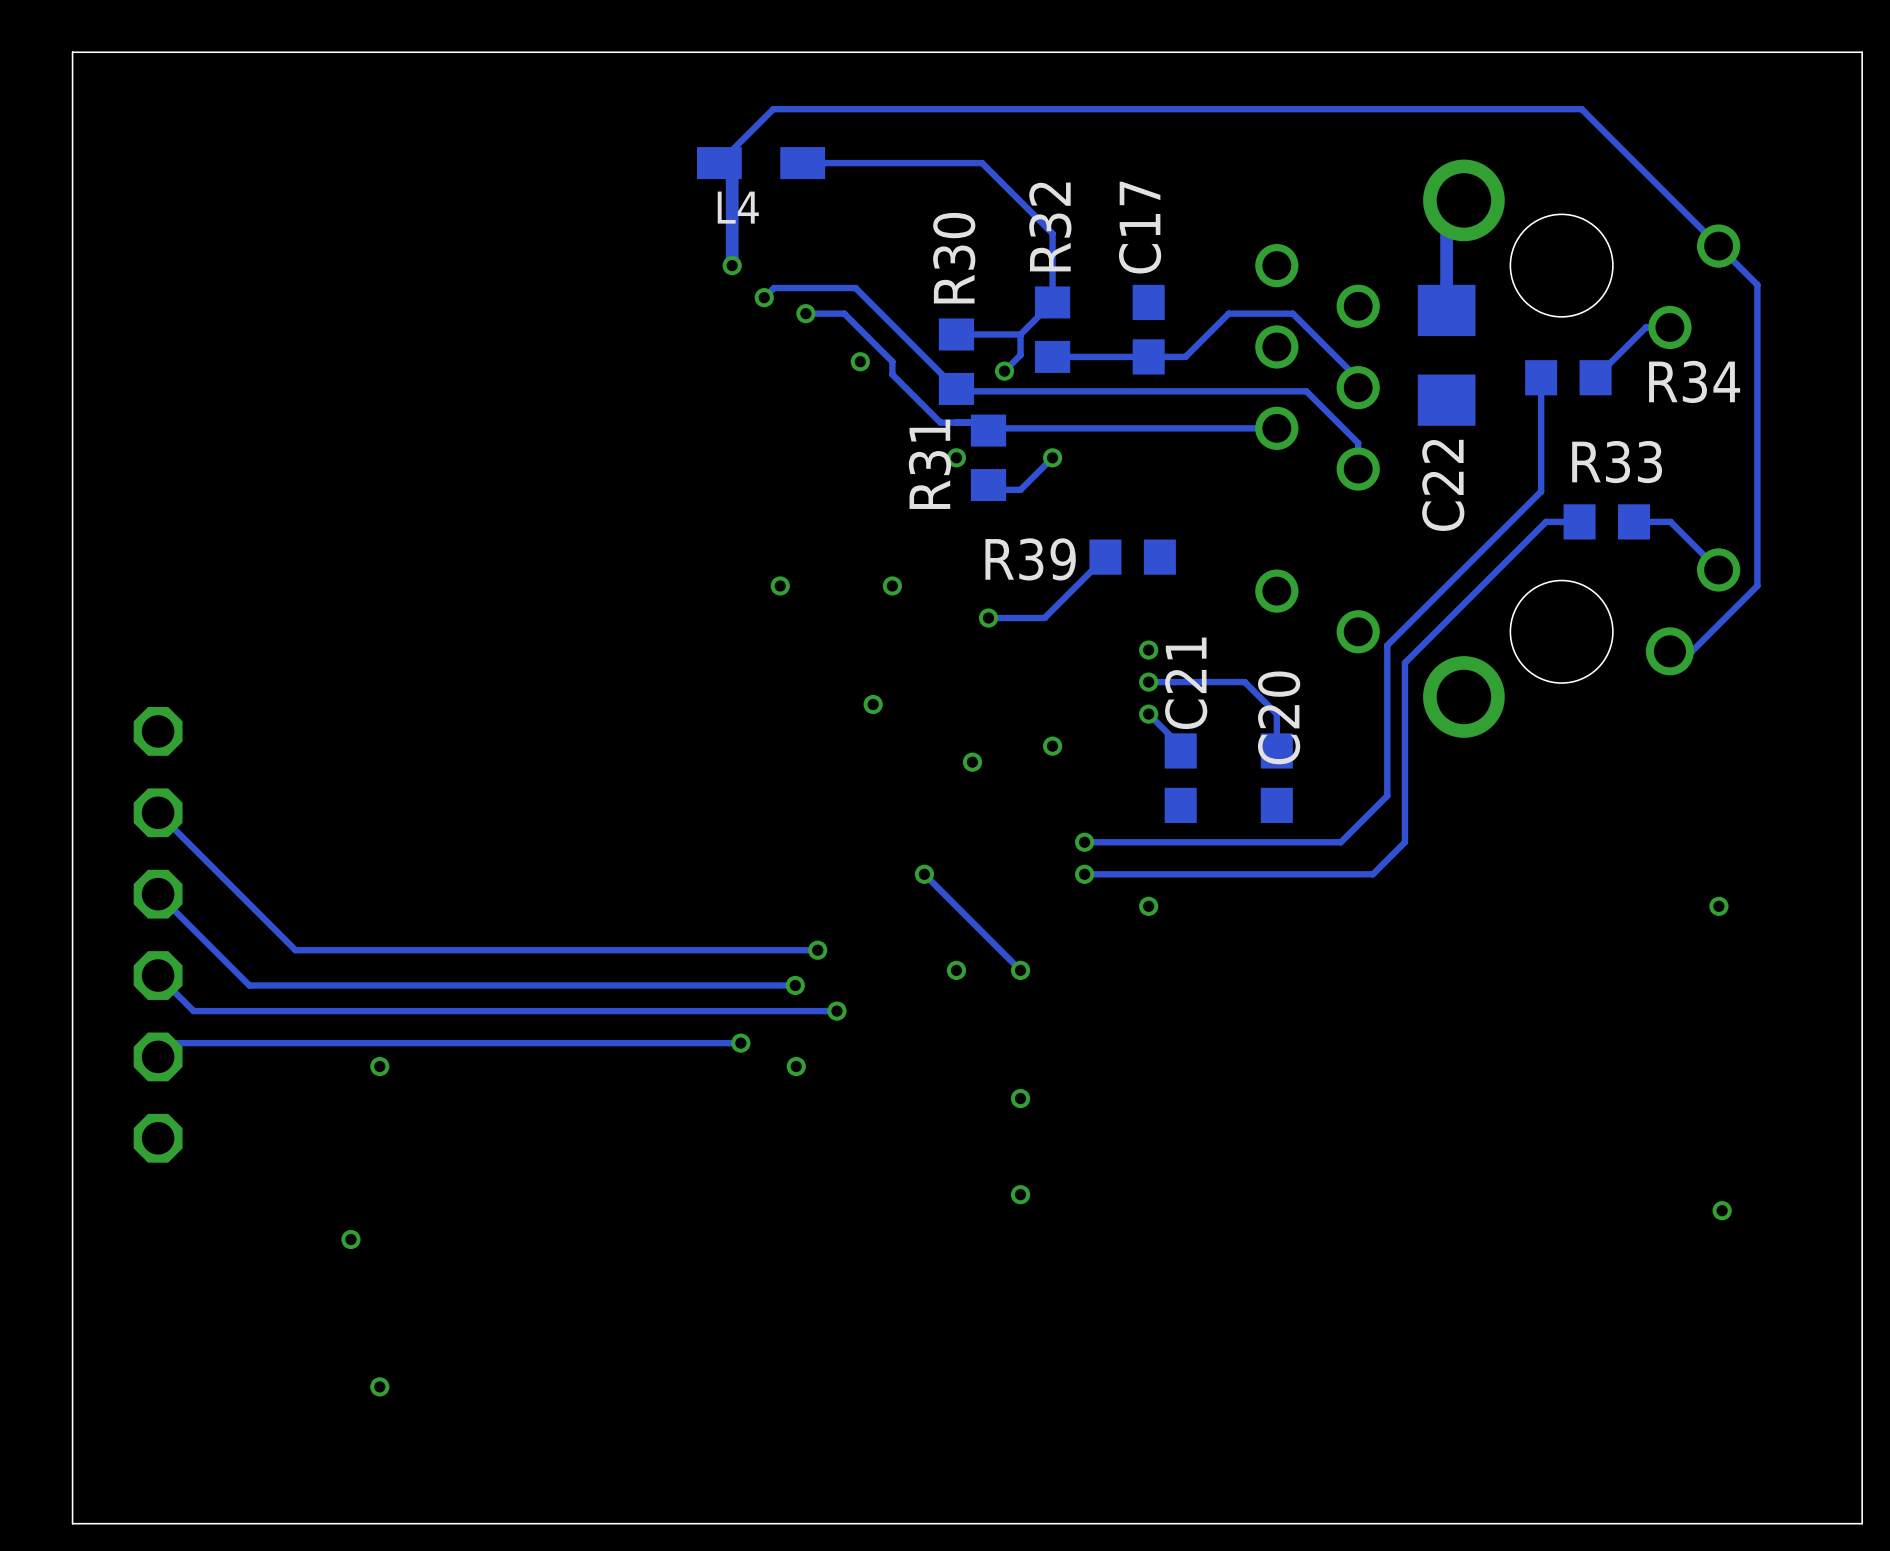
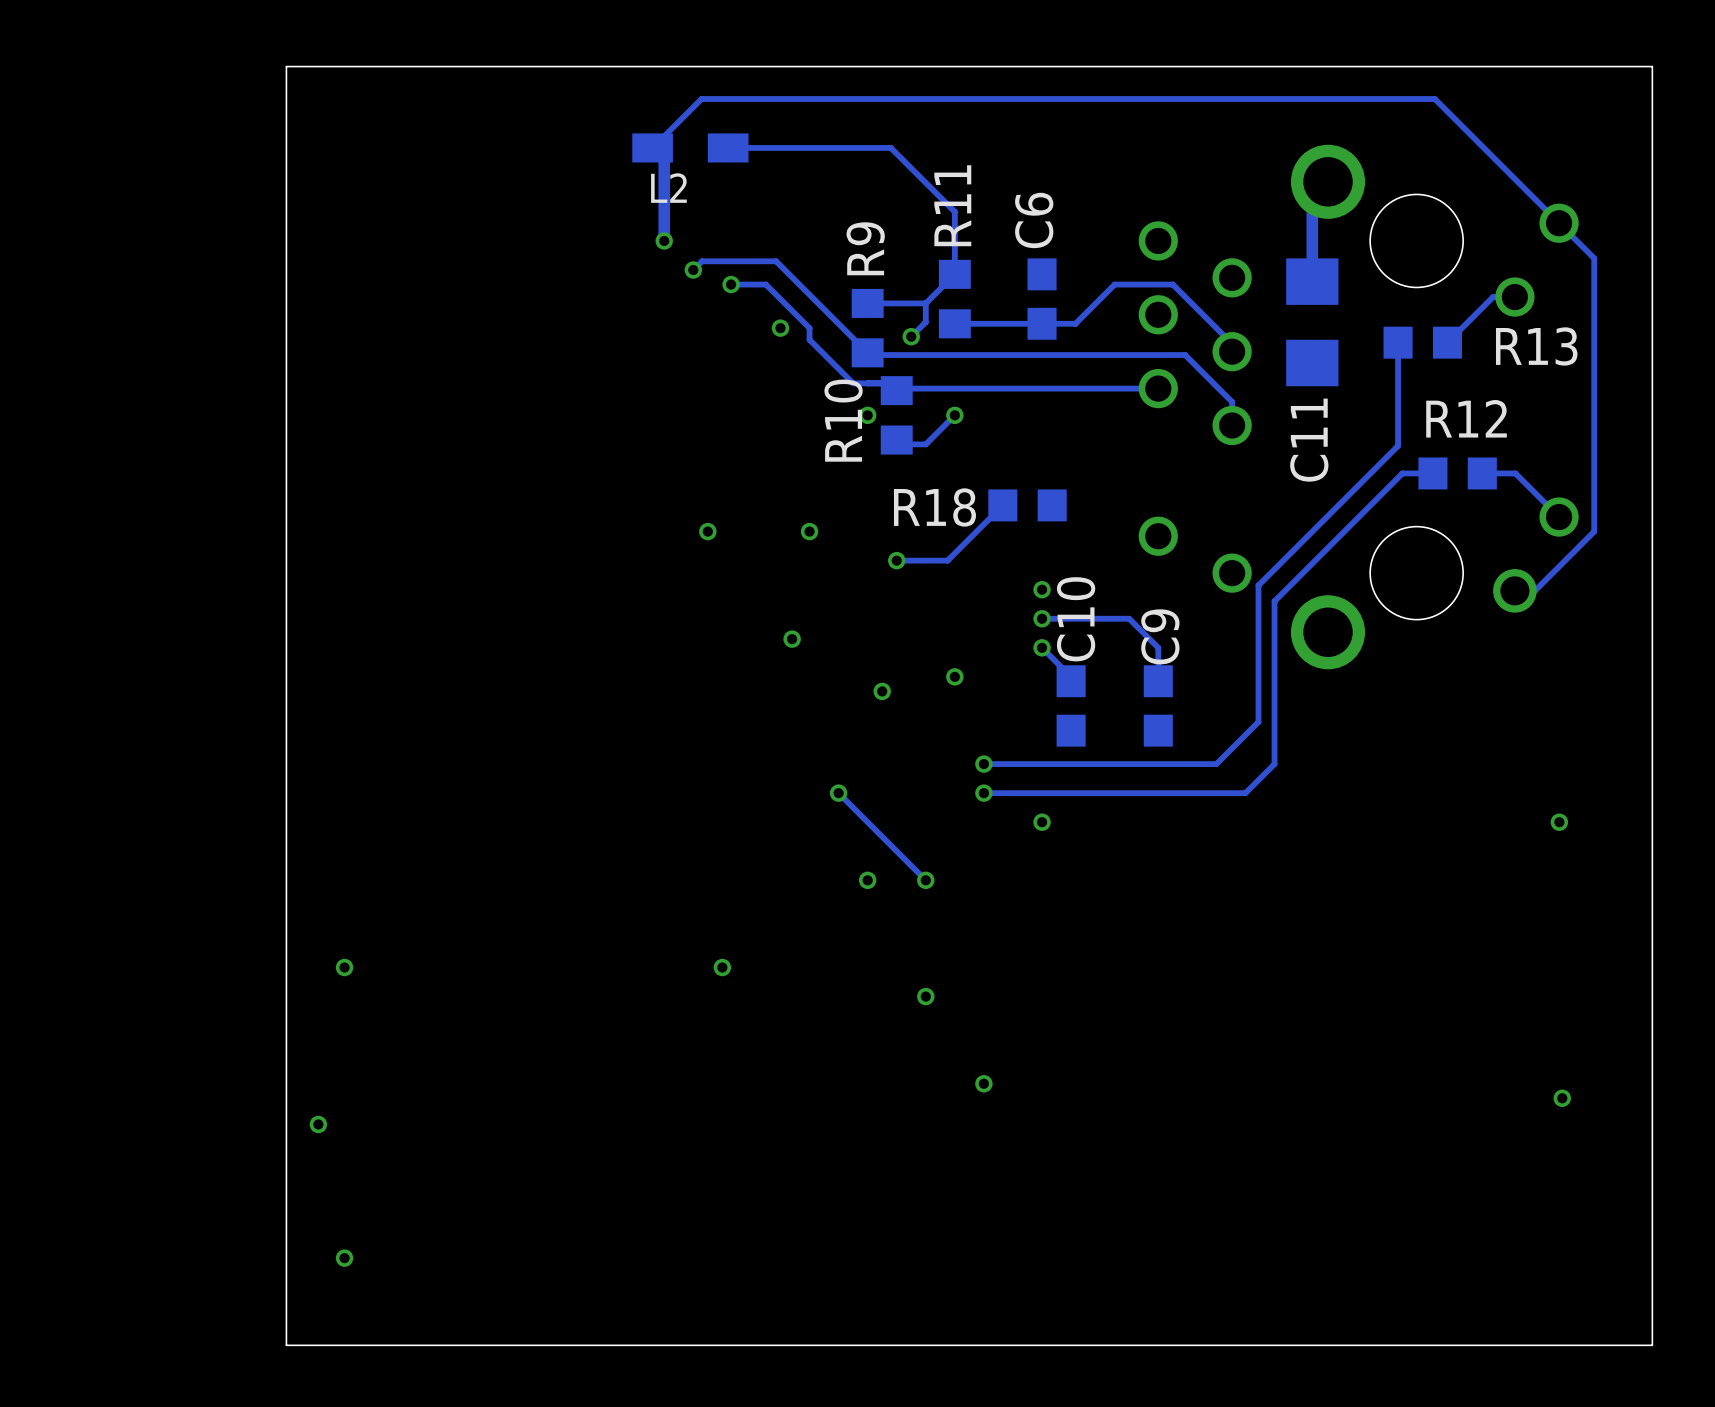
board edge: (1862, 52) (72, 52) (72, 1523) (1862, 1523) (1862, 52) -> (1652, 66) (1652, 1345) (286, 1345) (286, 66) (1652, 66)
L4 name: L4 (738, 207) -> L2 (668, 188)
R32 name: R32 (1050, 226) -> R11 (952, 205)
C17 name: C17 (1140, 227) -> C6 (1034, 220)
R30 name: R30 (954, 258) -> R9 (865, 248)
R34 name: R34 (1694, 381) -> R13 (1536, 346)
R33 name: R33 (1617, 462) -> R12 (1466, 418)
R31 name: R31 (929, 464) -> R10 (843, 420)
C22 name: C22 (1443, 485) -> C11 (1309, 440)
R39 name: R39 (1030, 559) -> R18 (934, 507)
C21 name: C21 (1186, 683) -> C10 (1076, 619)
C20 name: C20 (1279, 717) -> C9 (1160, 636)
track: (158, 812) (295, 950) (817, 950) -> none
track: (158, 894) (249, 985) (795, 985) -> none
part: (158, 934) -> none
via: (817, 950) -> none
track: (158, 975) (193, 1011) (836, 1011) -> none
via: (795, 985) -> none
via: (836, 1011) -> none
track: (740, 1043) (171, 1043) (158, 1056) -> none
via: (740, 1043) -> none
via position: (1020, 1194) -> (983, 1083)

